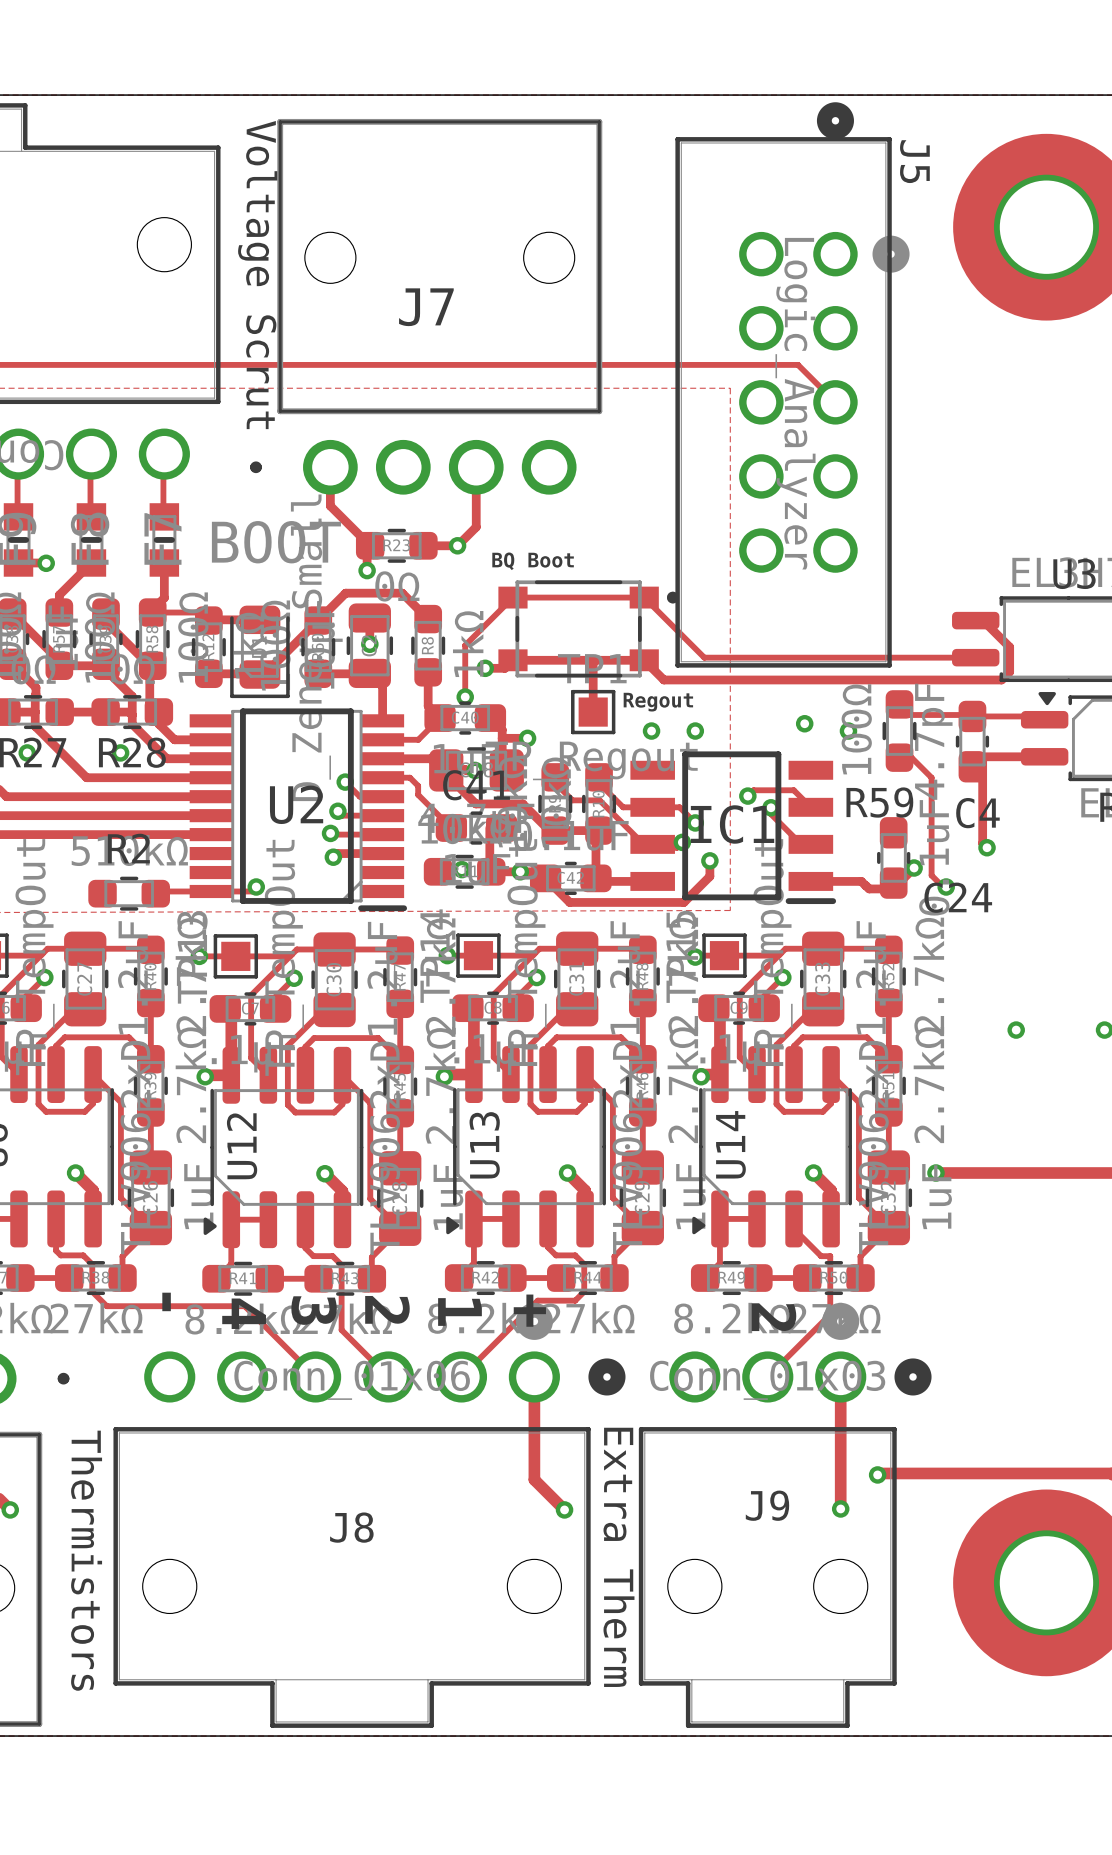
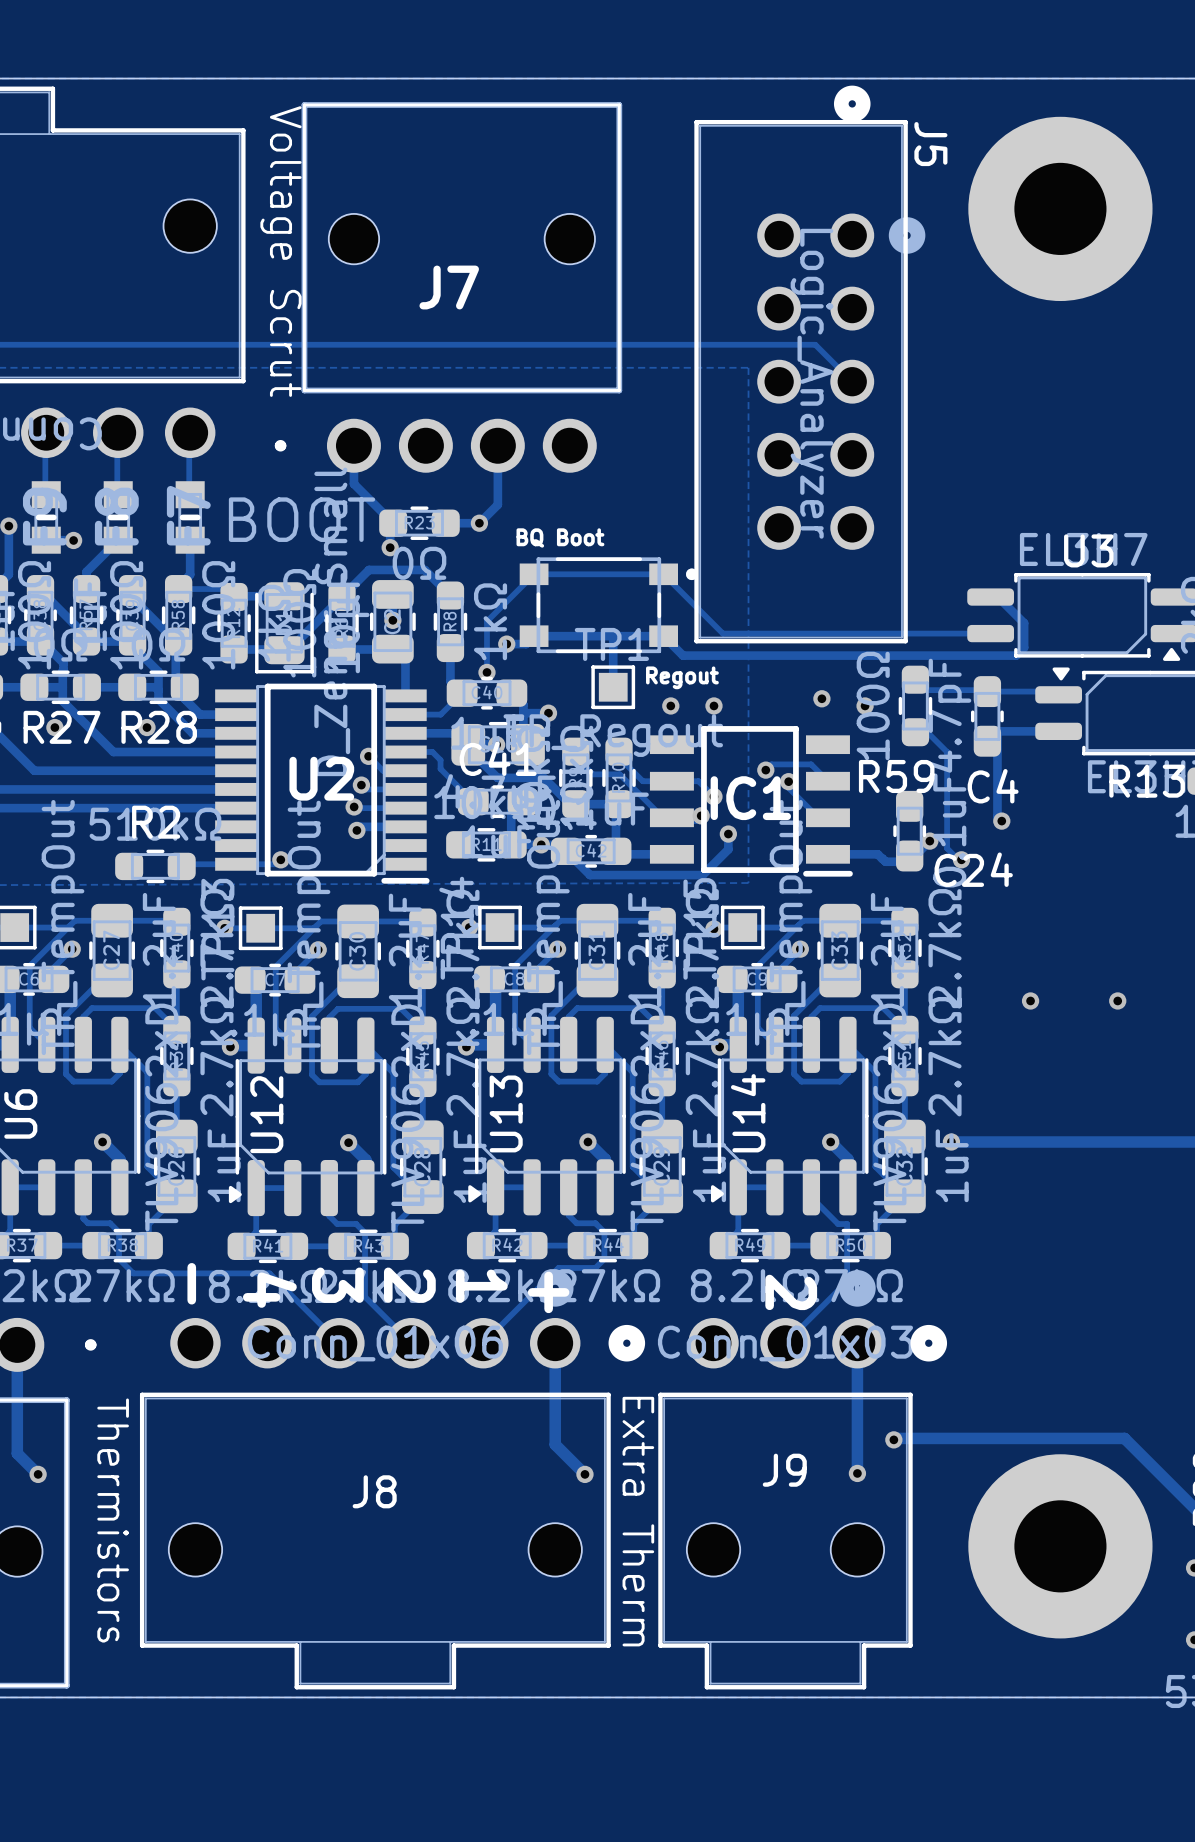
via: (461, 869) -> none

